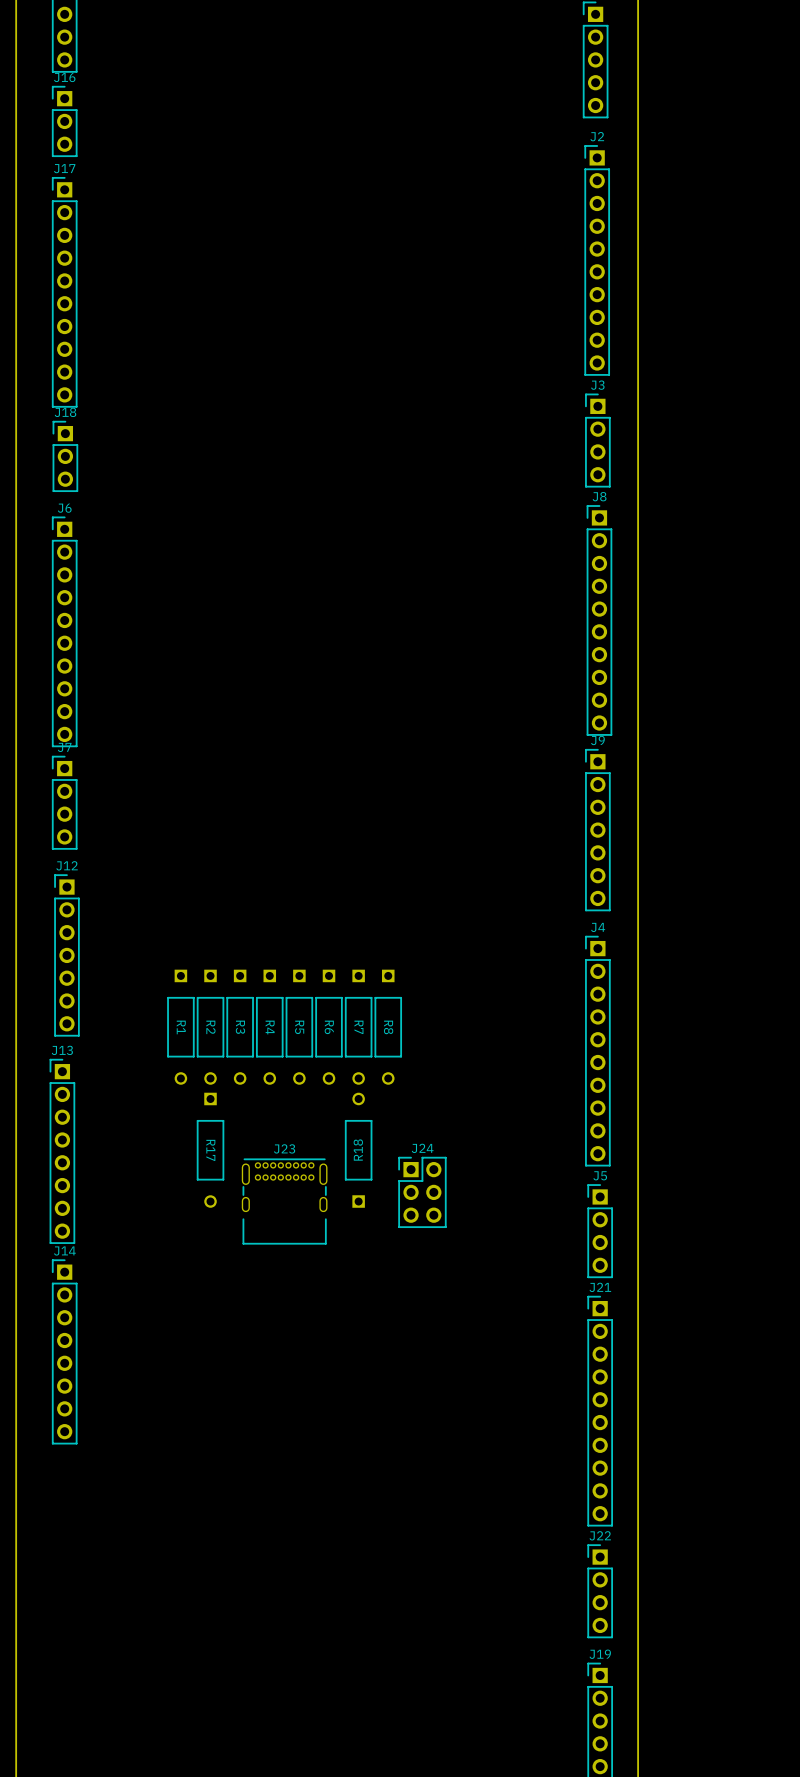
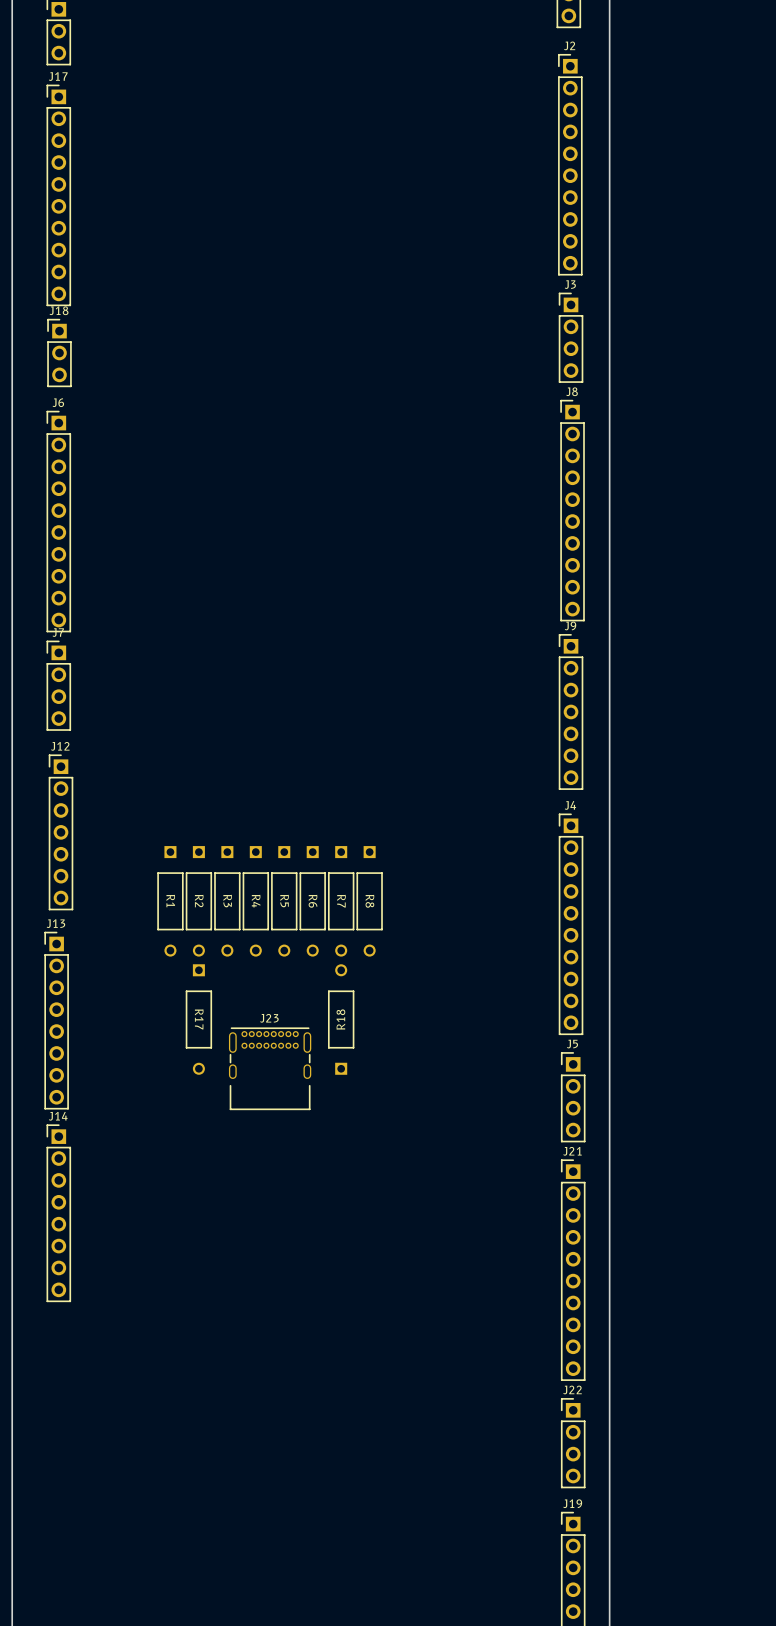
J24: (422, 1192) -> none

